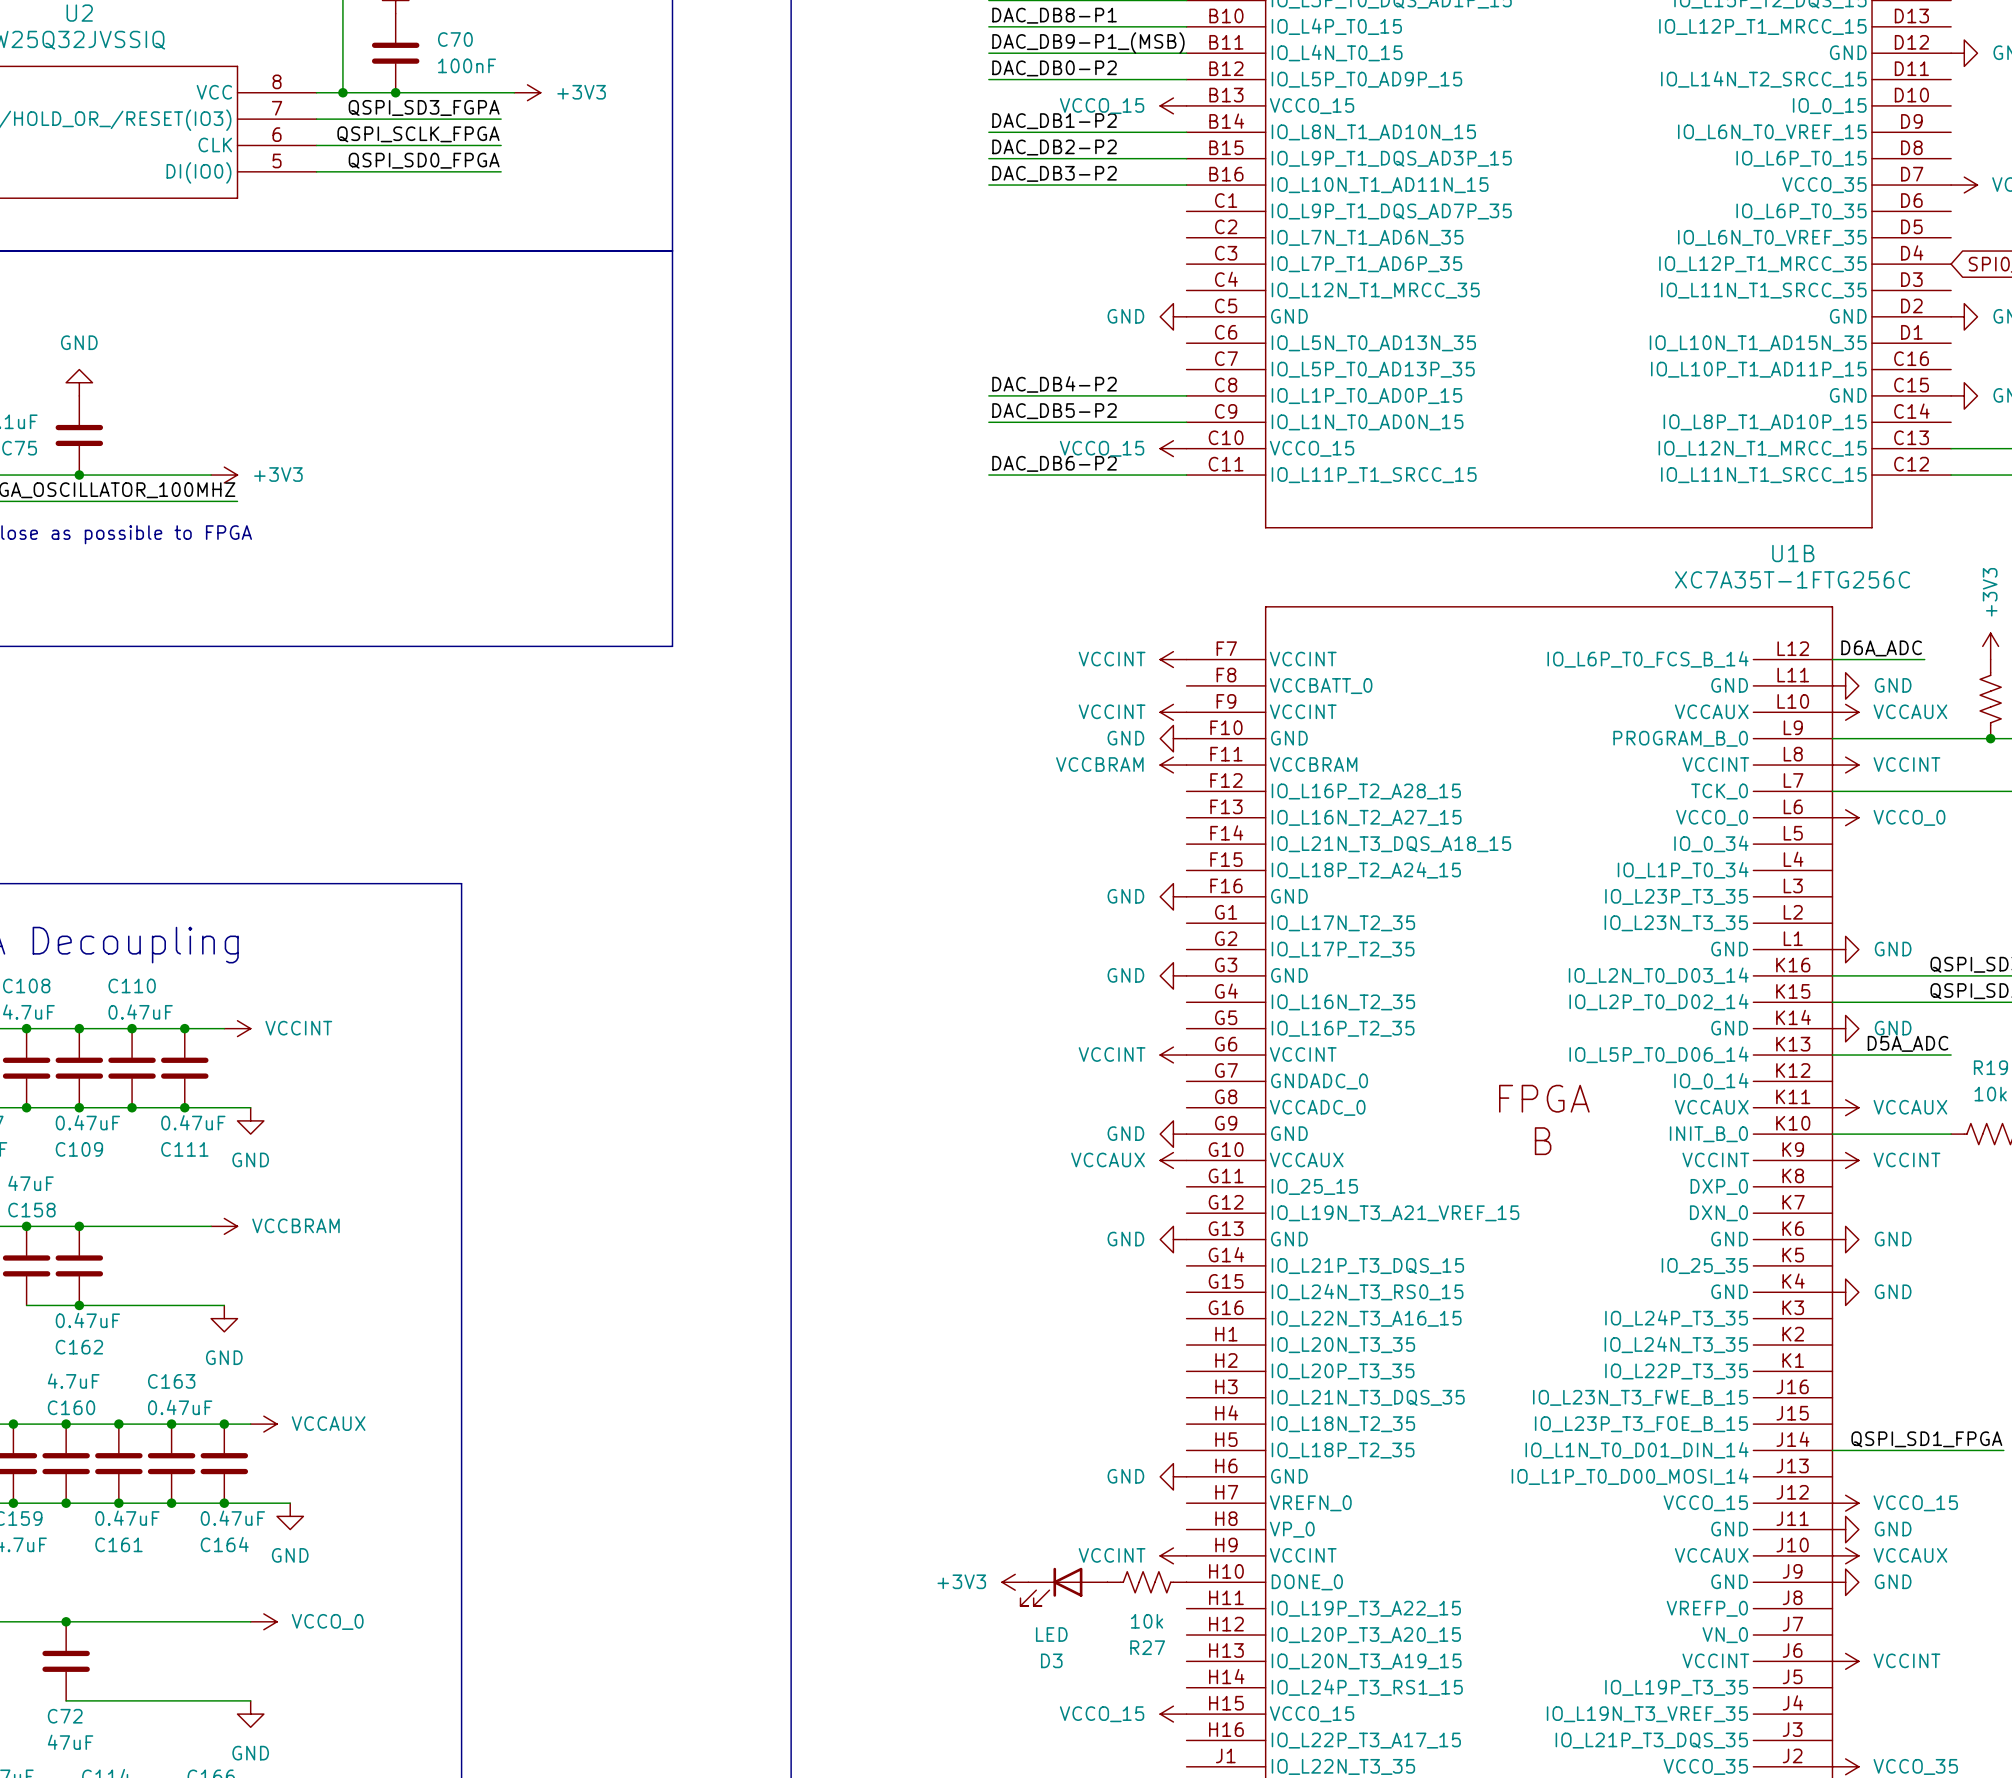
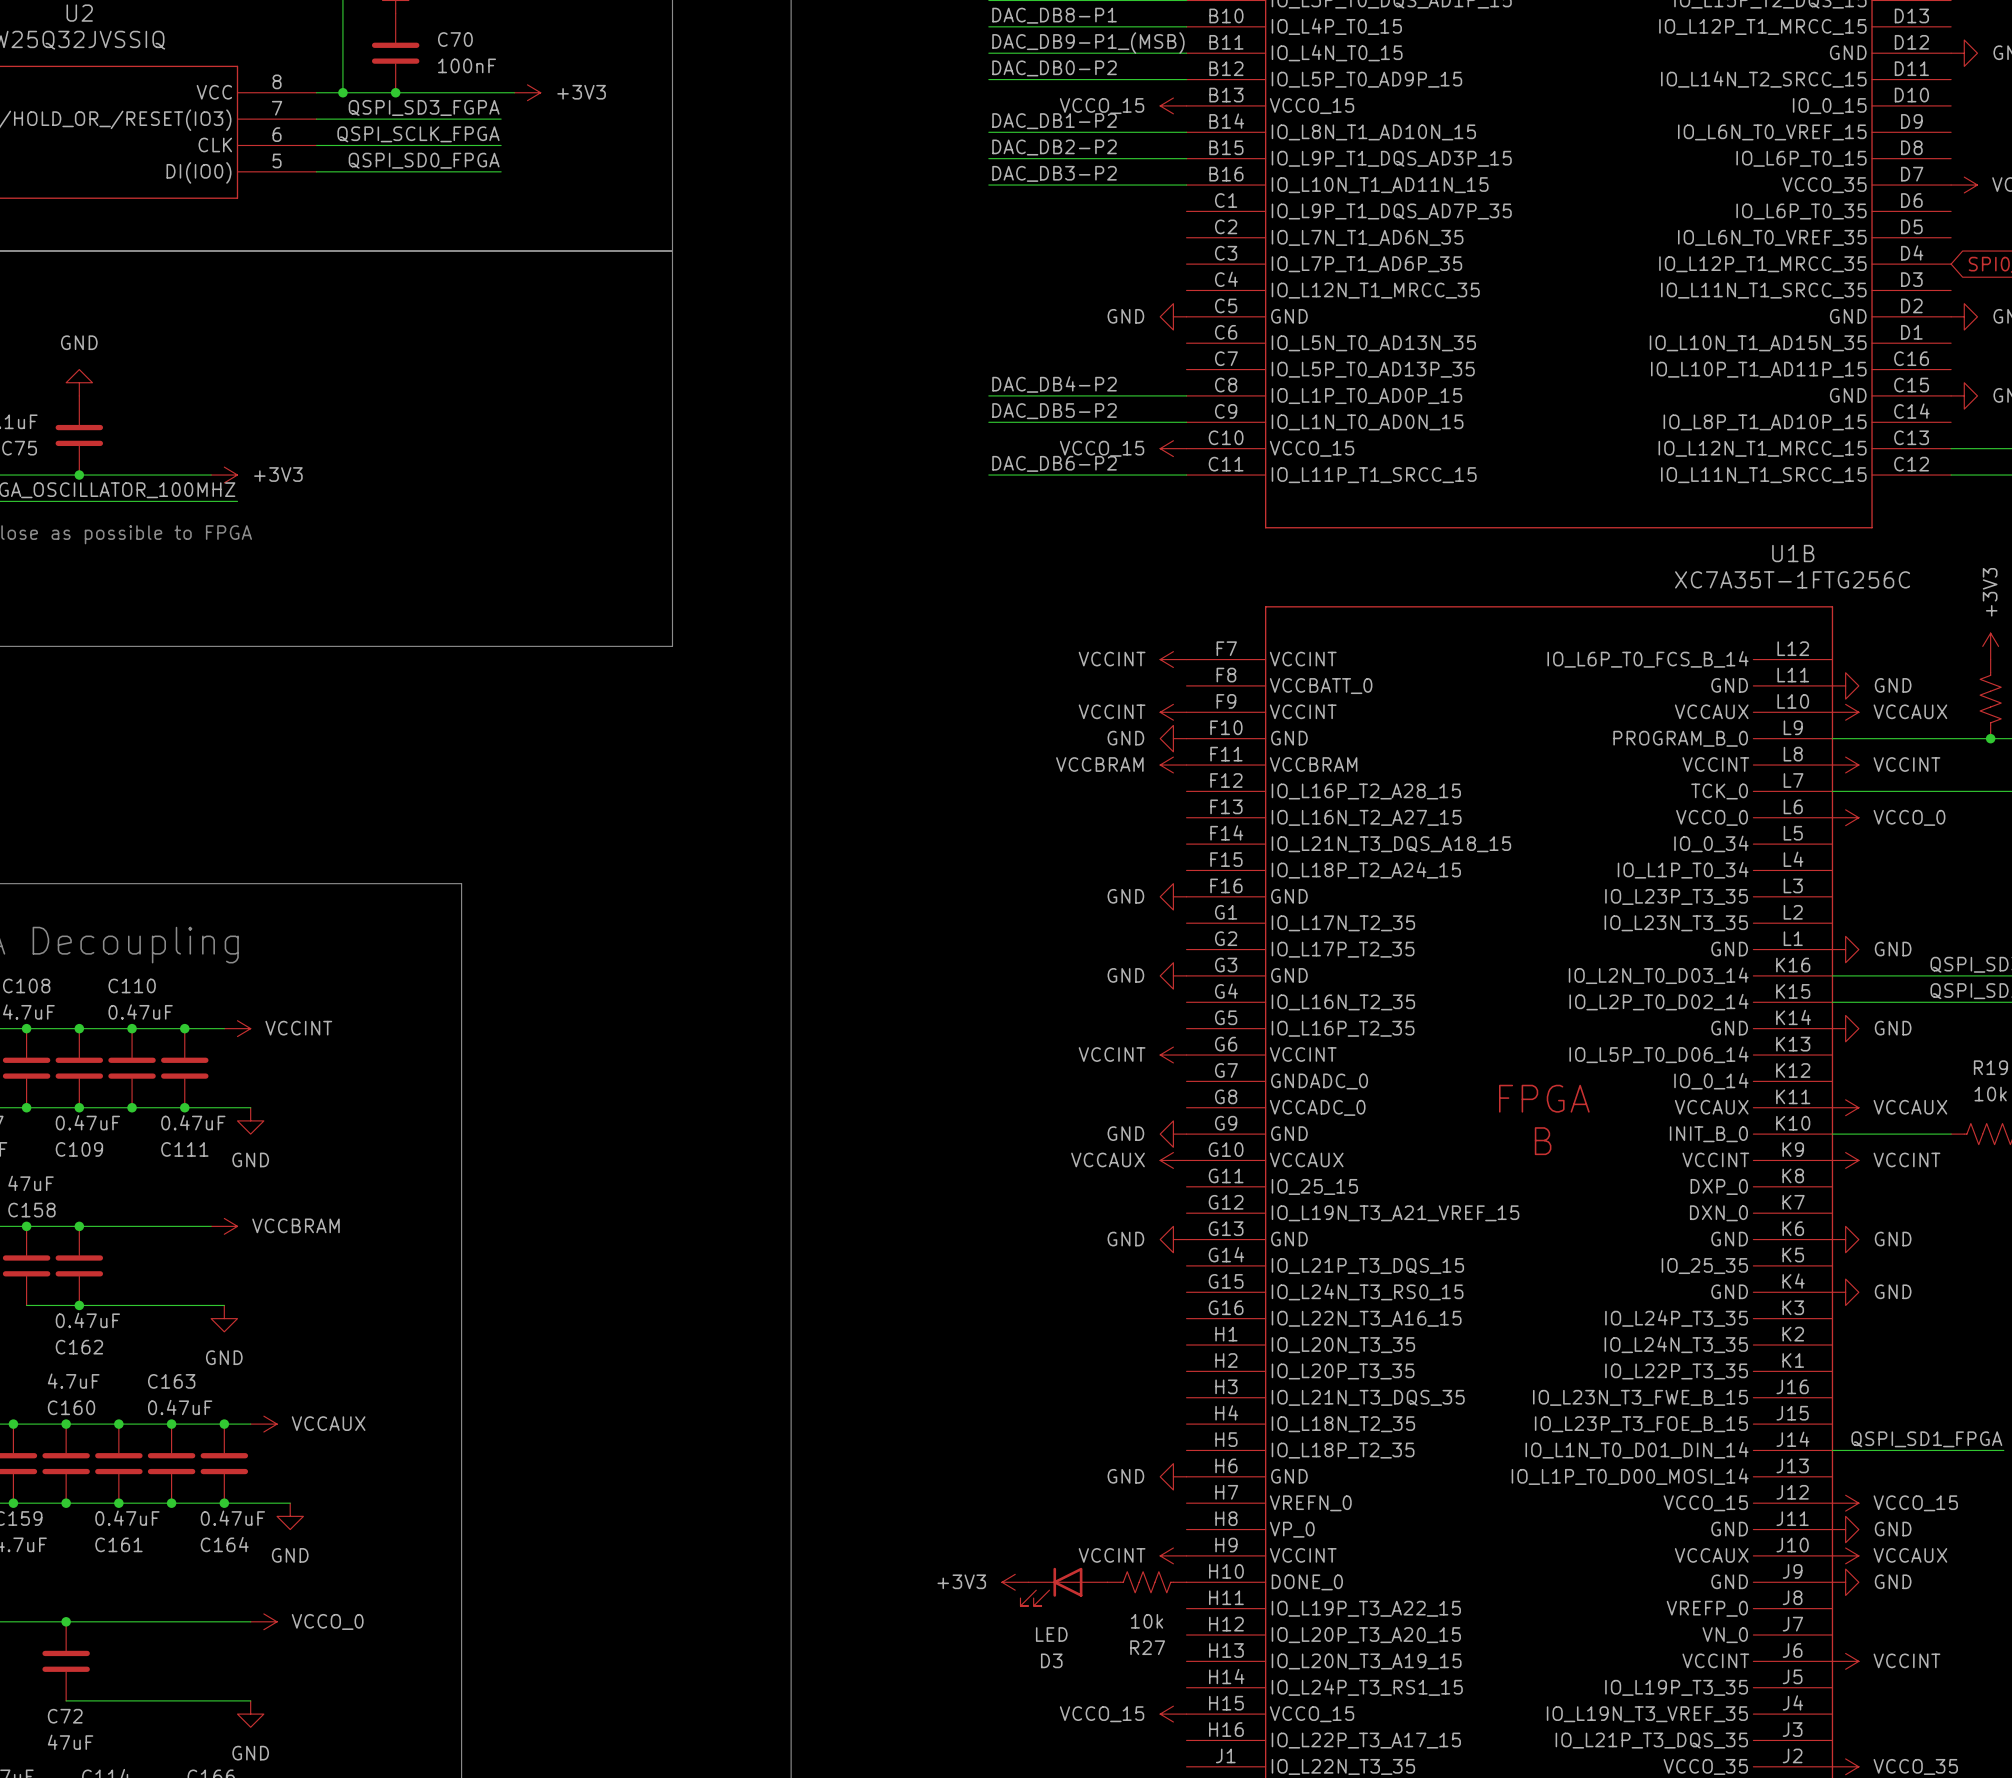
label: D6A_ADC (1881, 648) -> none
wire: (1832, 659) (1924, 659) -> none
label: D5A_ADC (1908, 1043) -> none
wire: (1832, 1055) (1951, 1055) -> none

